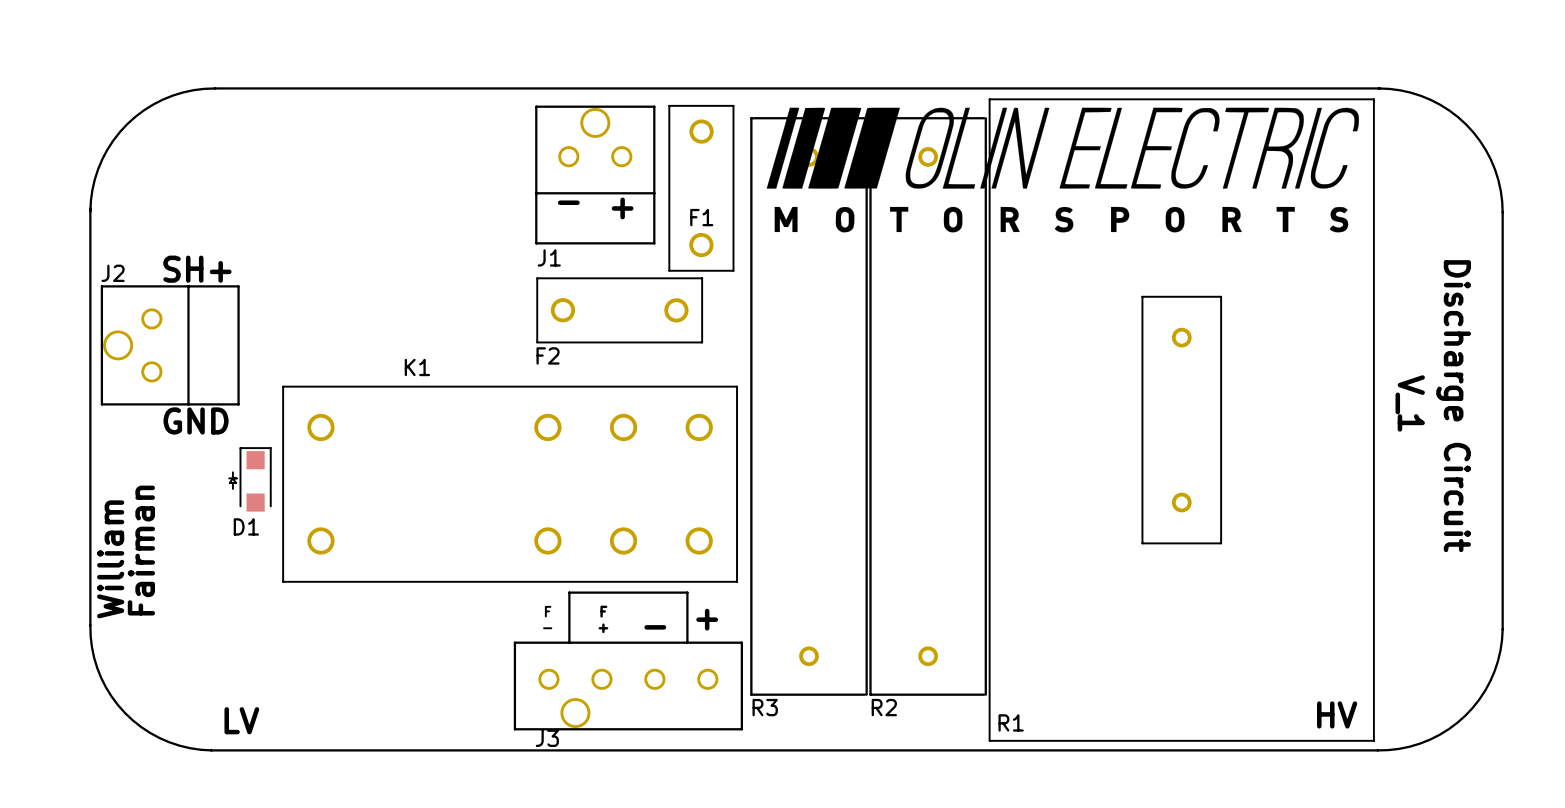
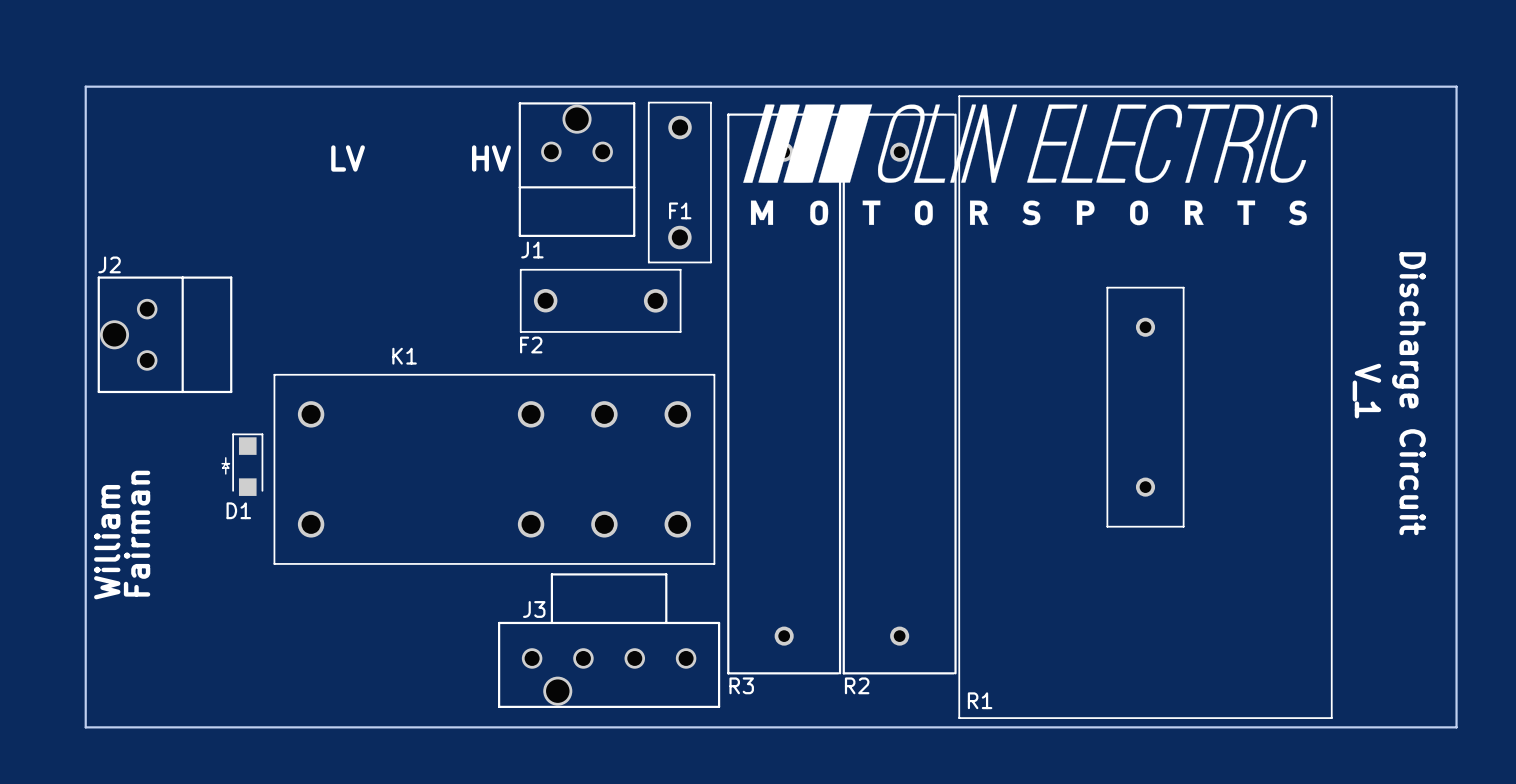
board edge: (1378, 88) (1400, 90) (1421, 95) (1440, 105) (1466, 124) (1480, 141) (1495, 170) (1500, 190) (1502, 212) -> (204, 727) (85, 727) (85, 86) (1456, 86) (1456, 205)
board edge: (1379, 88) (204, 88) (172, 95) (153, 104) (135, 116) (119, 131) (107, 149) (98, 169) (92, 189) (90, 211) -> none
text: none -> LV (348, 158)
text: none -> HV (491, 158)
text: - (568, 202) -> none
board edge: (90, 208) (90, 625) (94, 657) (101, 677) (111, 696) (125, 713) (141, 727) (159, 738) (179, 745) (211, 750) -> none
text: + (622, 208) -> none
text: SH+ (197, 269) -> none
text: GND (196, 420) -> none
text: F (548, 611) -> none
text: F (603, 611) -> none
text: + (707, 619) -> none
text: - (655, 627) -> none
text: - (547, 628) -> none
text: + (603, 628) -> none
board edge: (1502, 629) (1500, 650) (1494, 671) (1485, 690) (1465, 715) (1439, 734) (1419, 743) (1399, 748) (1377, 750) -> (1456, 610) (1456, 727) (1335, 727)
text: HV (1337, 714) -> none
text: LV (241, 720) -> none
J3 name position: J3 (547, 738) -> J3 (534, 609)

